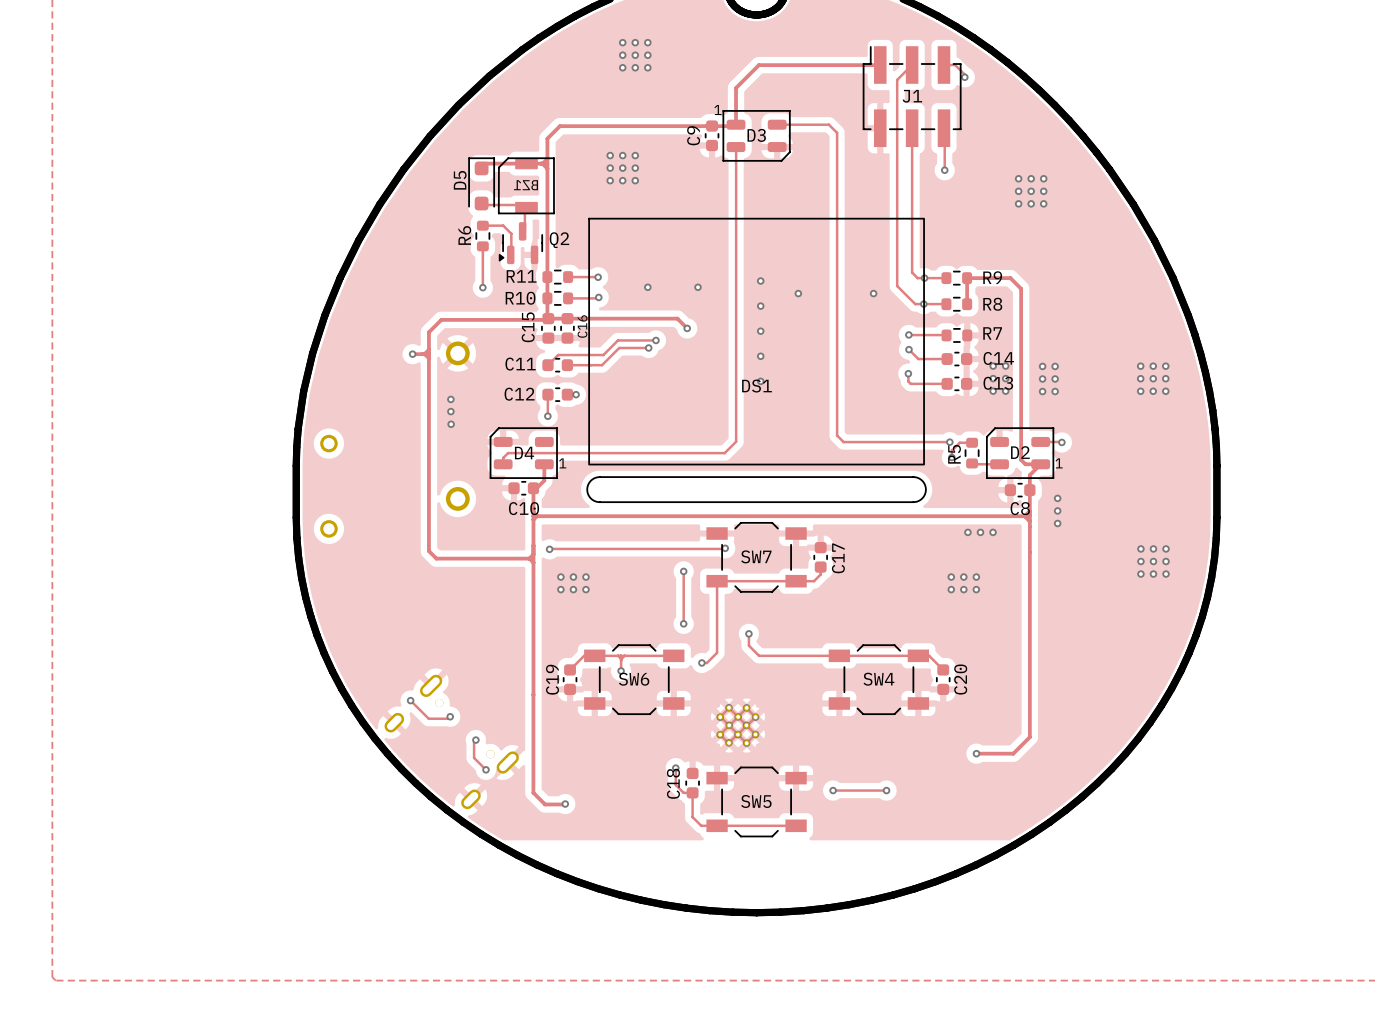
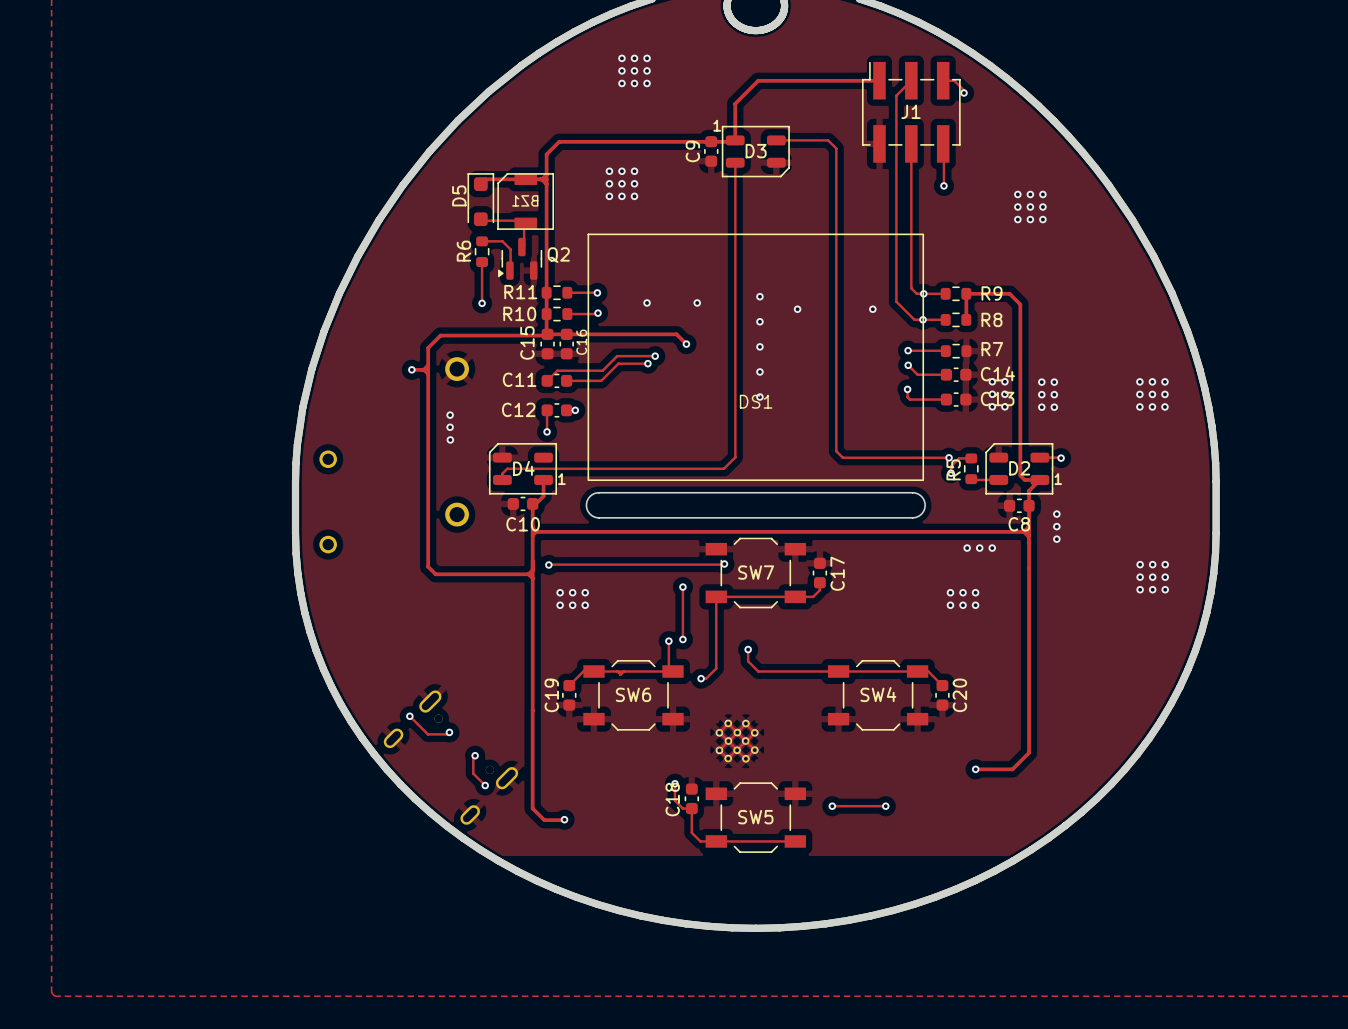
track: none -> (668, 641) (668, 667) (673, 671)
track: (620, 655) (621, 671) -> none
via position: (621, 671) -> (668, 641)

